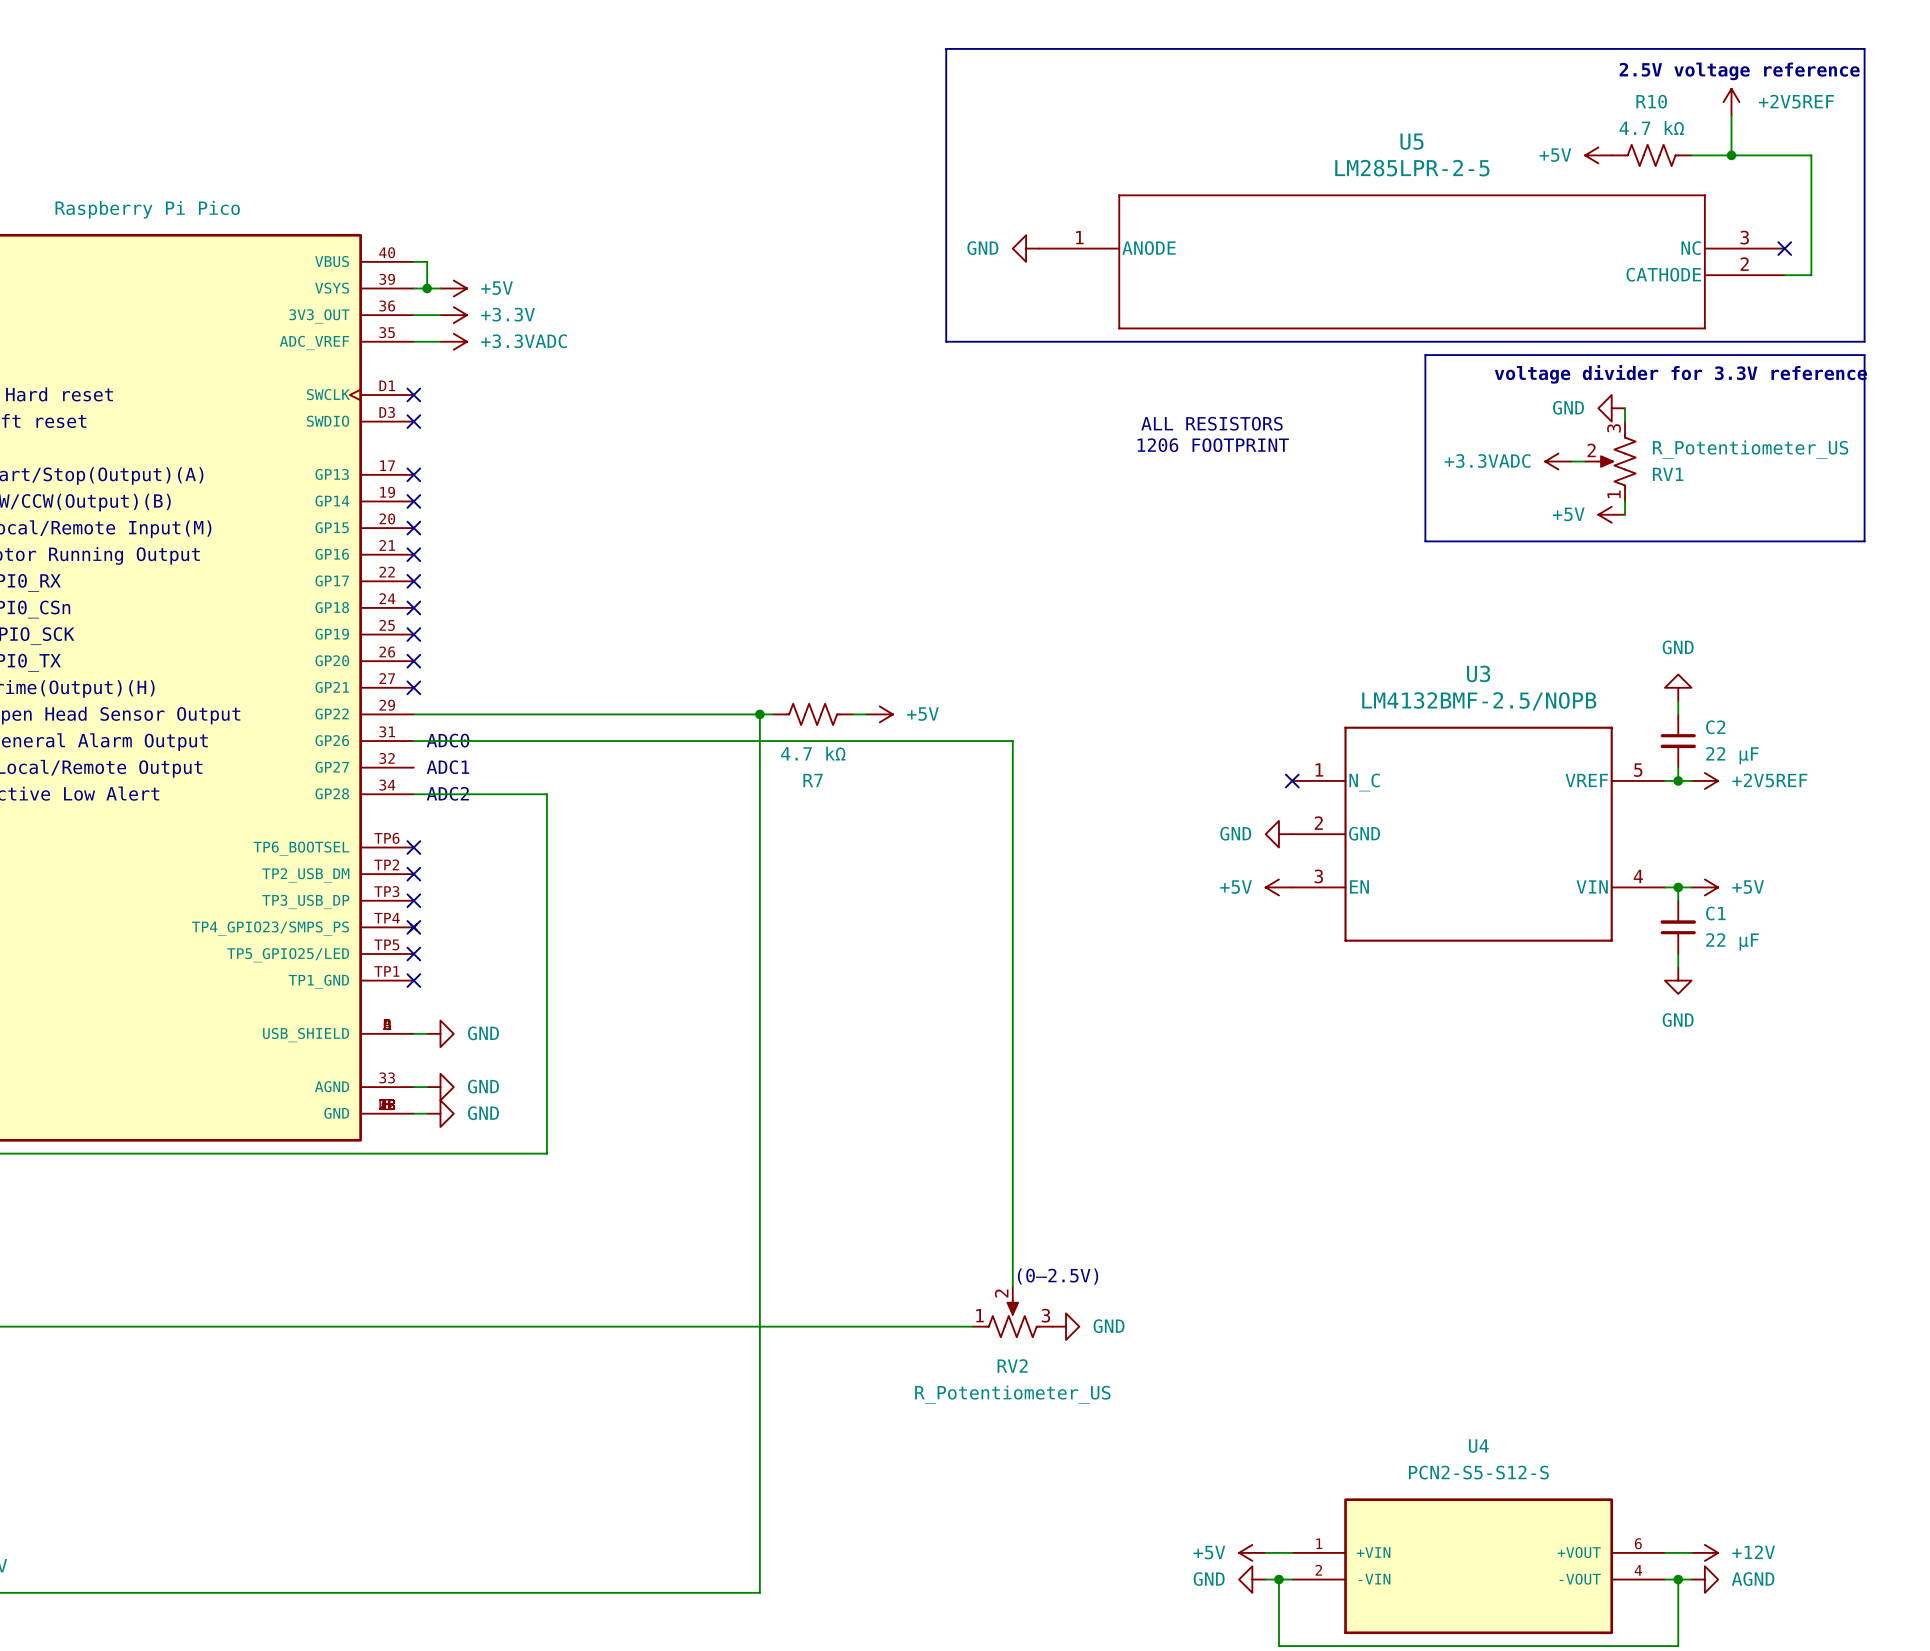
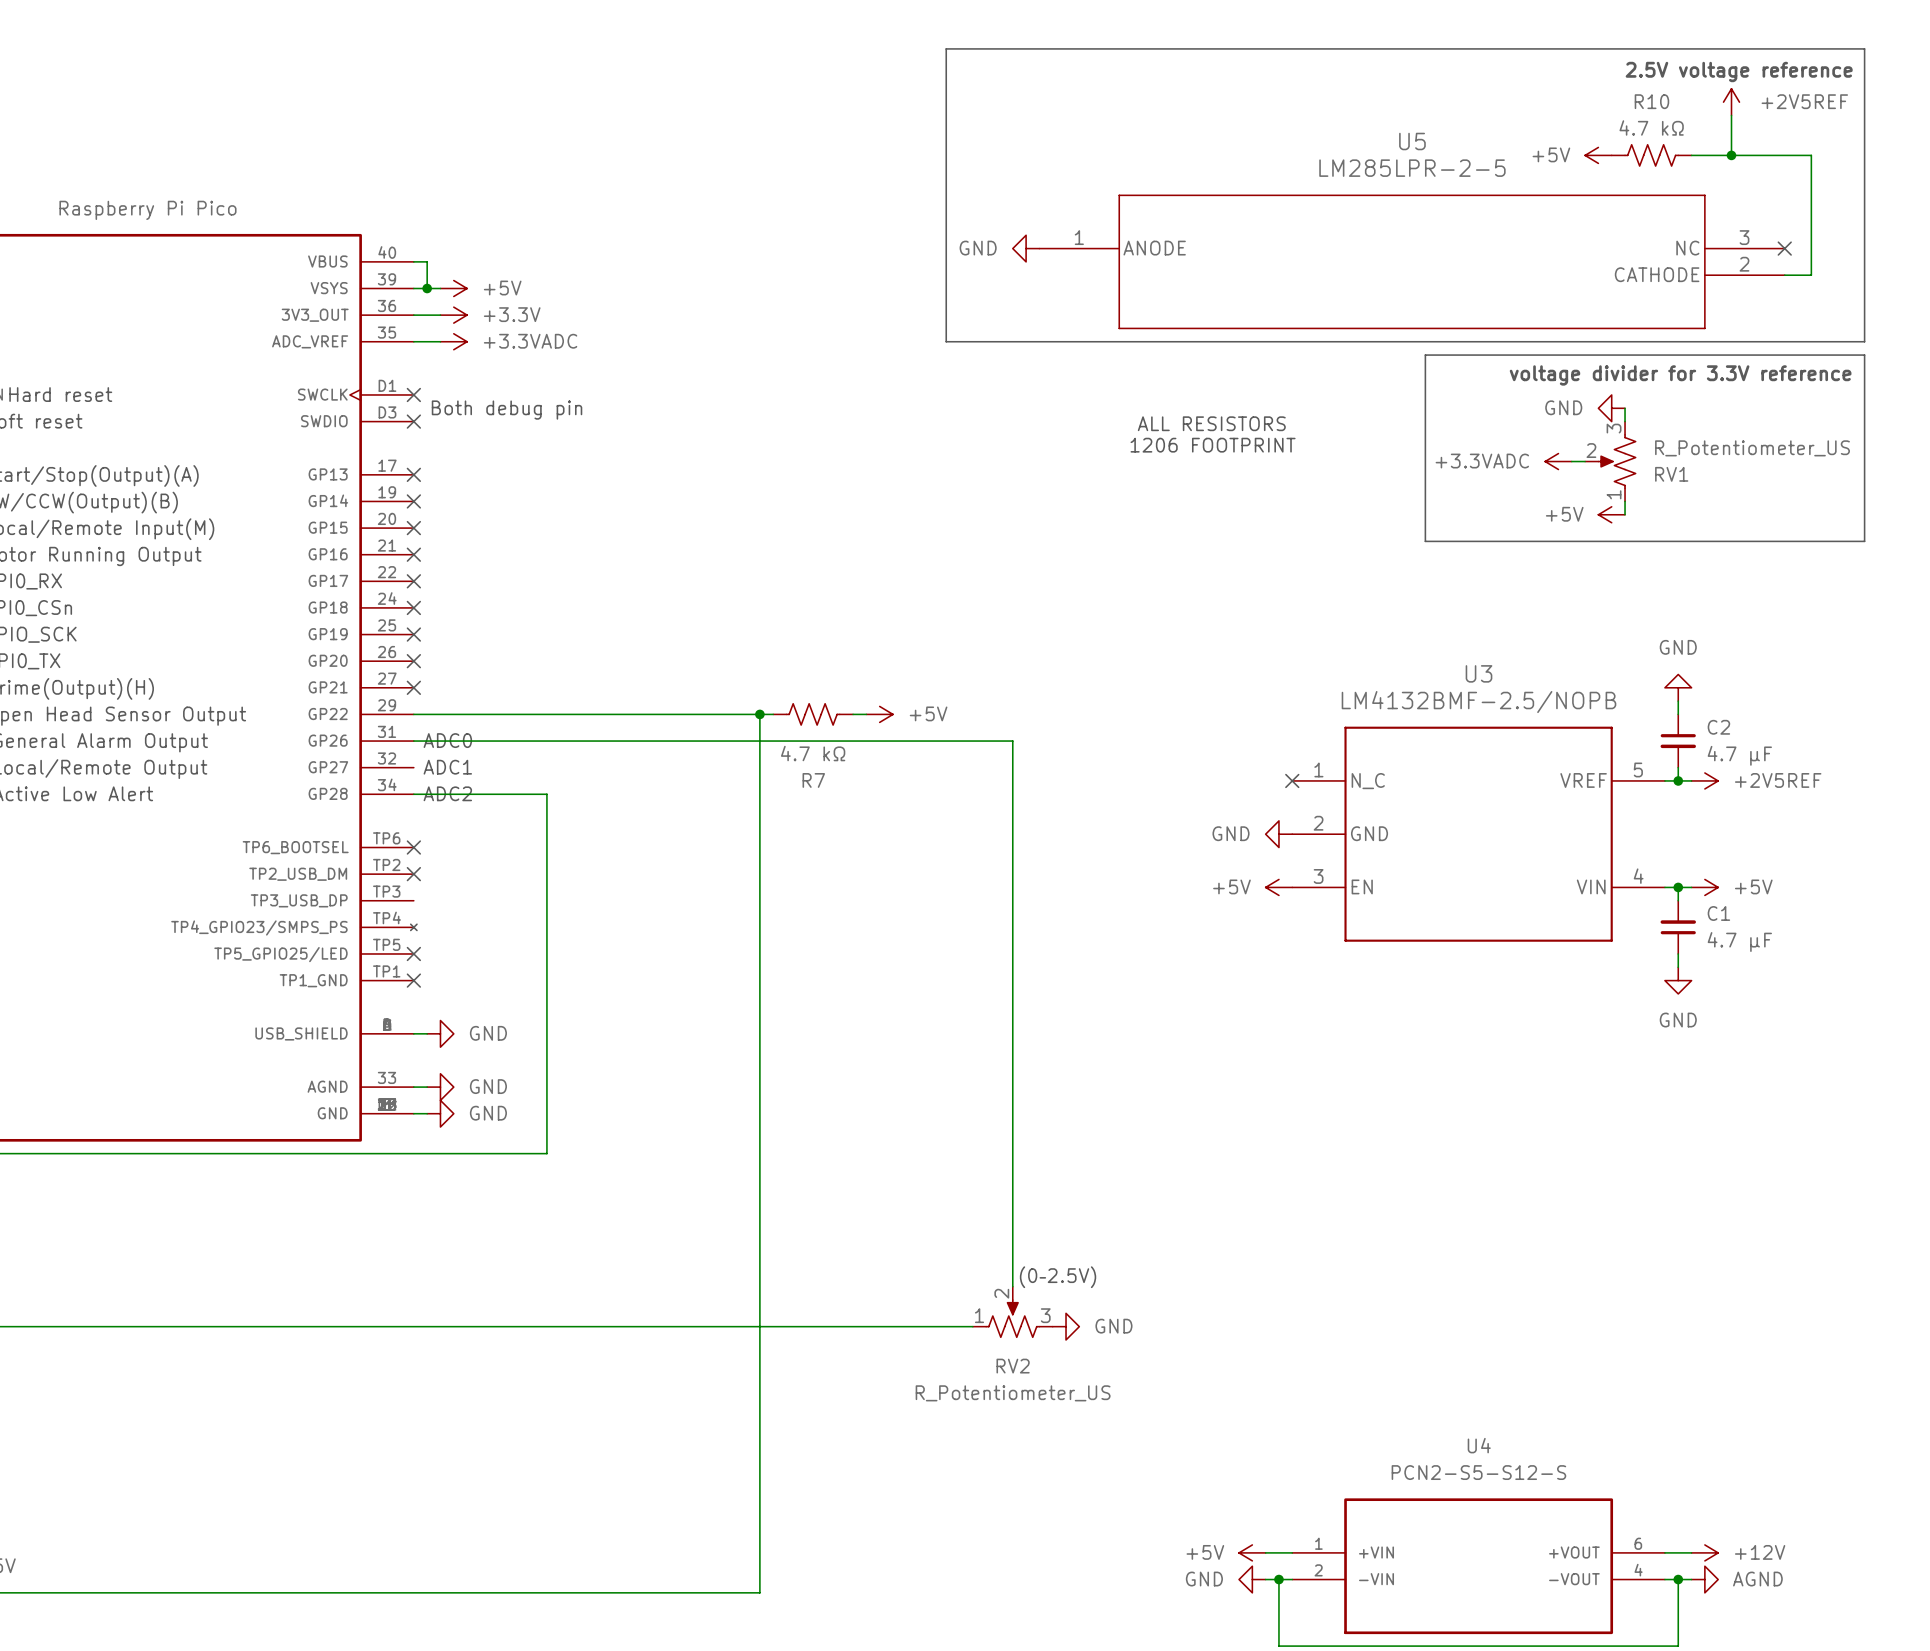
text: none -> Both debug pin (507, 410)
C2 value: 22 µF (1732, 755) -> 4.7 µF (1739, 755)
no-connect mark: (413, 900) -> none
no-connect mark: (413, 927) -> none
C1 value: 22 µF (1732, 941) -> 4.7 µF (1739, 942)

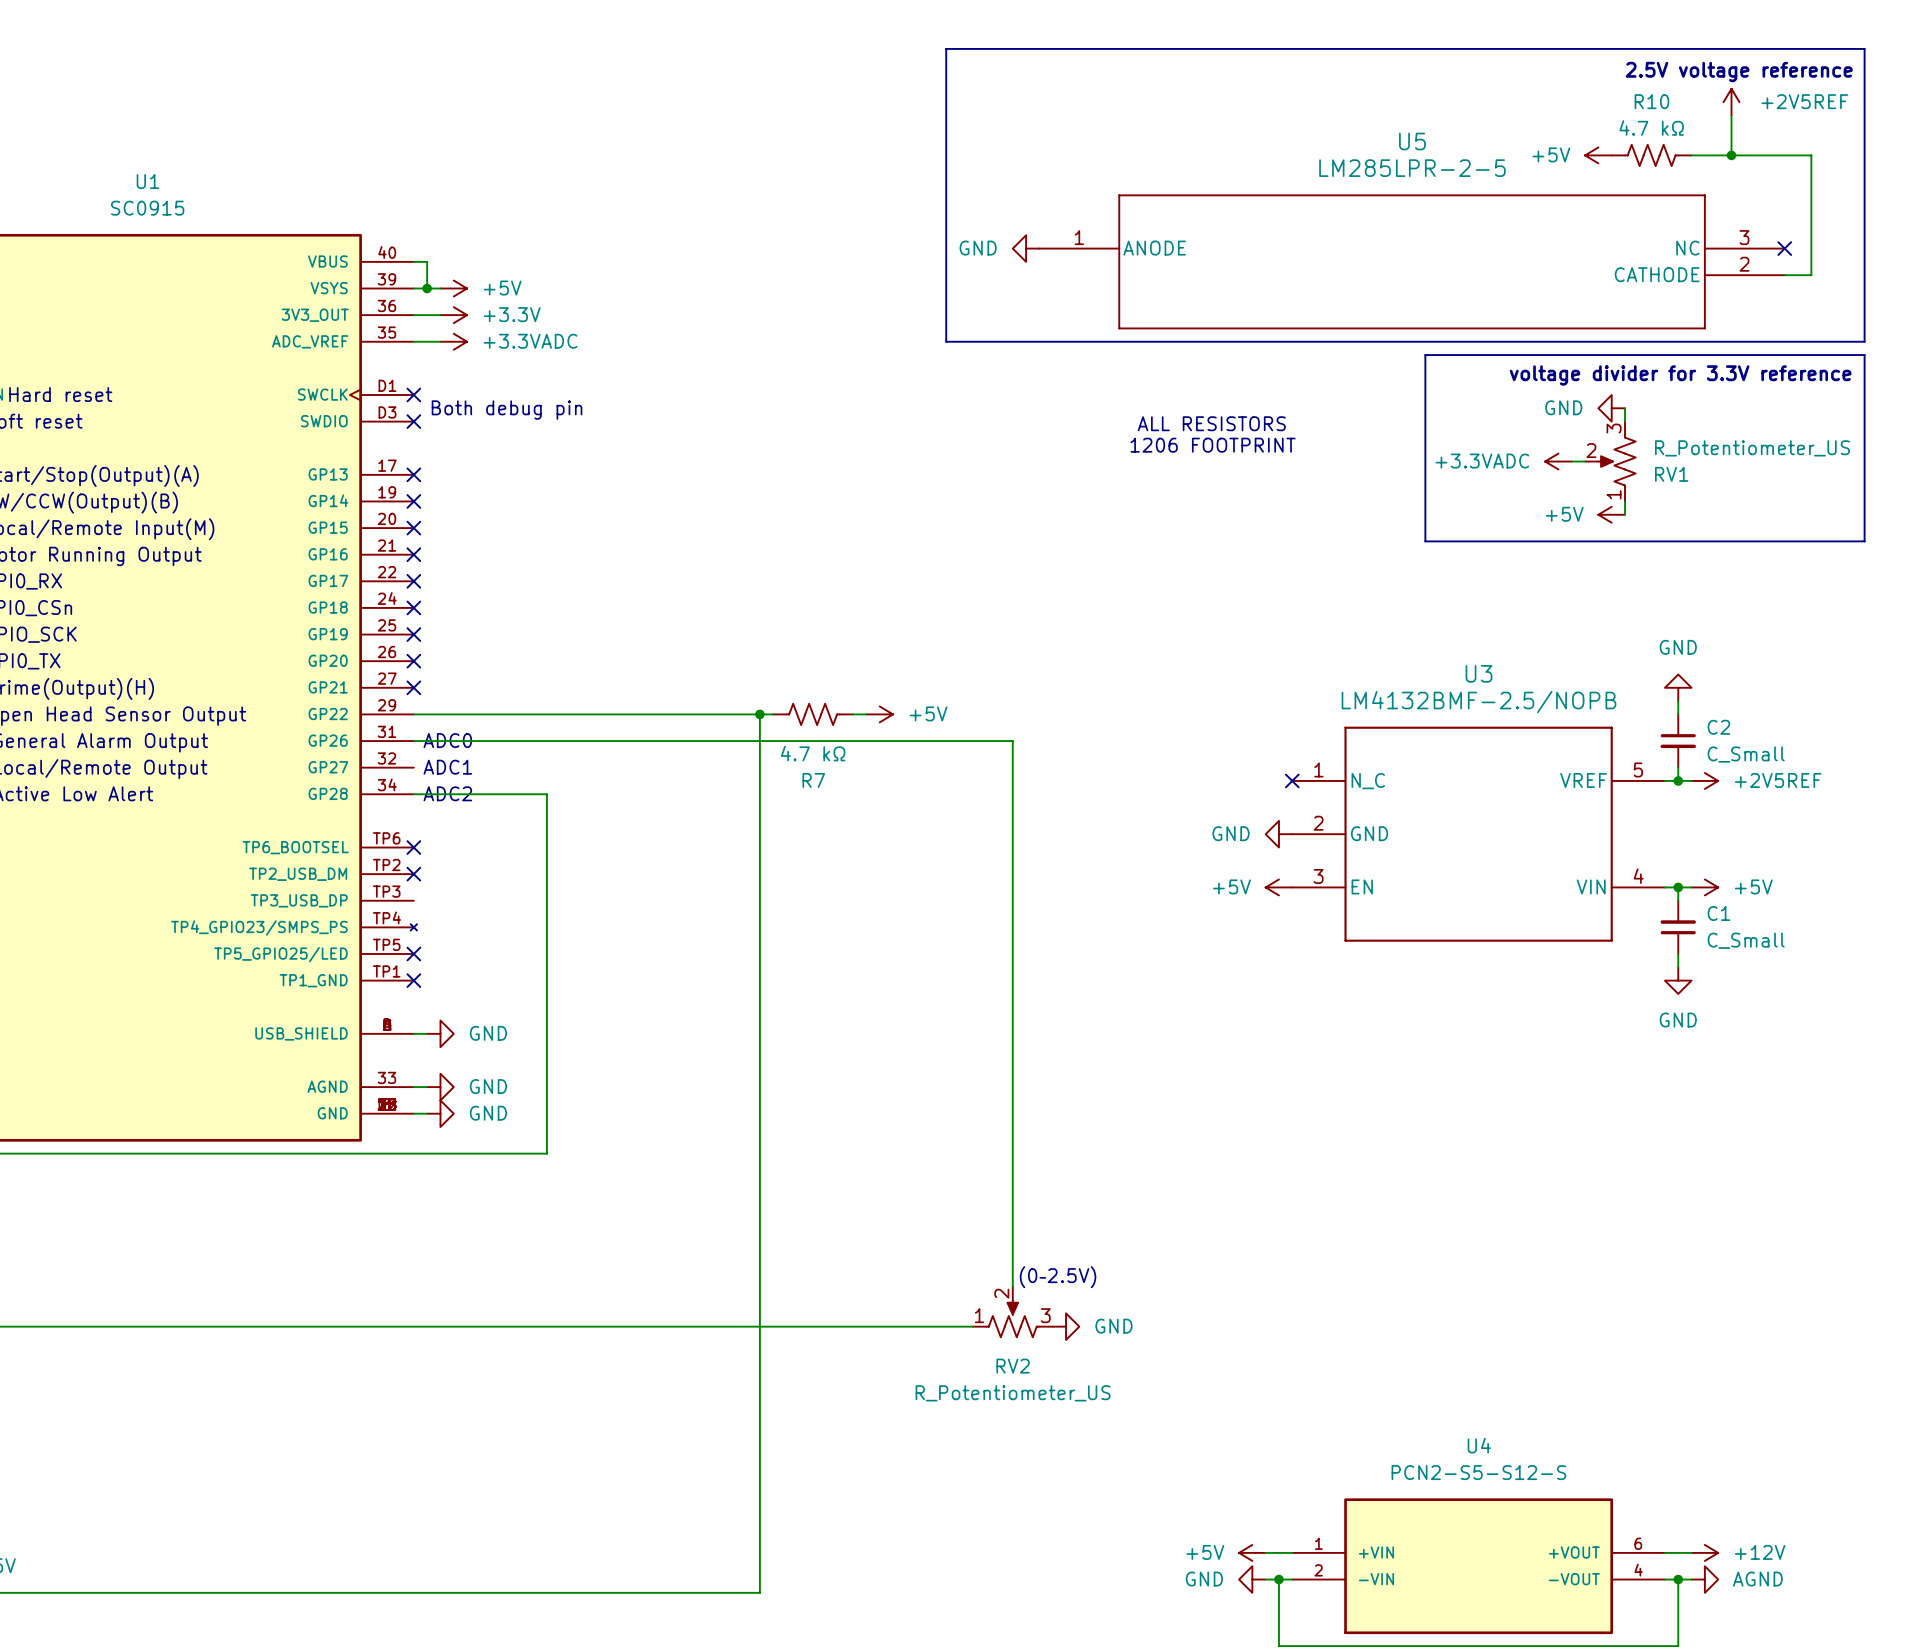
U1 name: none -> U1 (147, 181)
U1 value: Raspberry Pi Pico (147, 210) -> SC0915 (147, 208)
C2 value: 4.7 µF (1739, 755) -> C_Small (1746, 754)
C1 value: 4.7 µF (1739, 942) -> C_Small (1746, 940)

